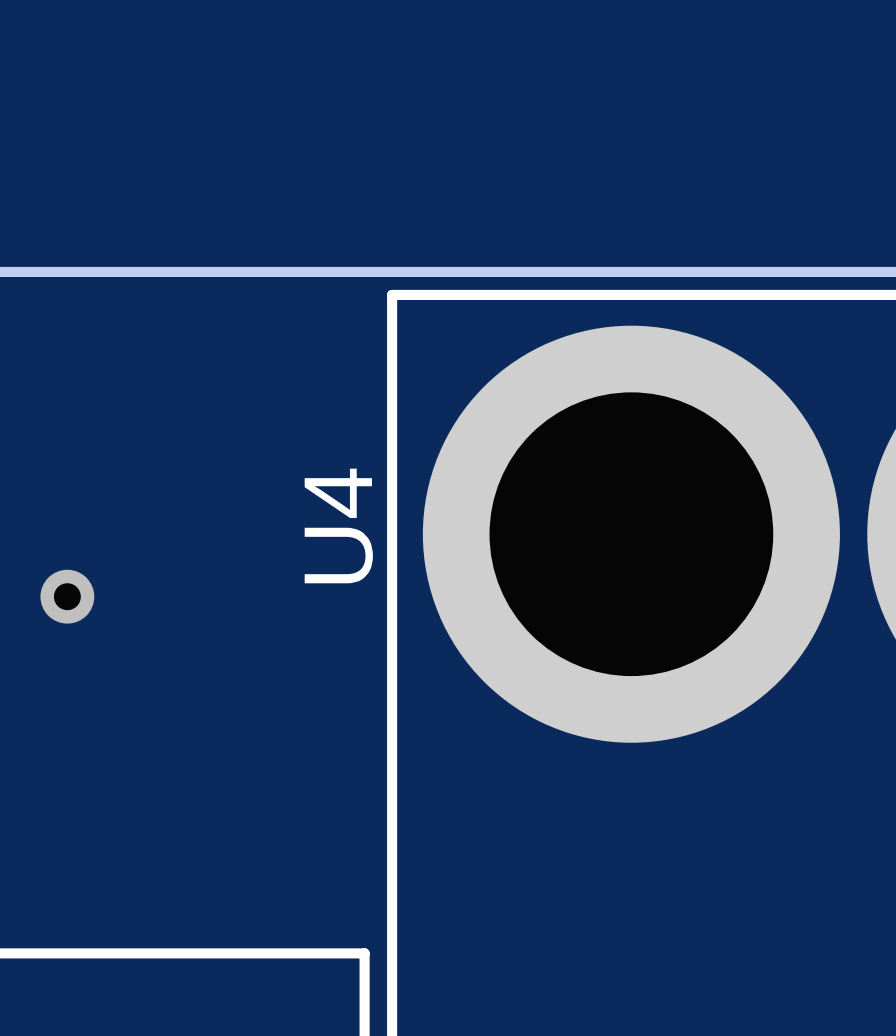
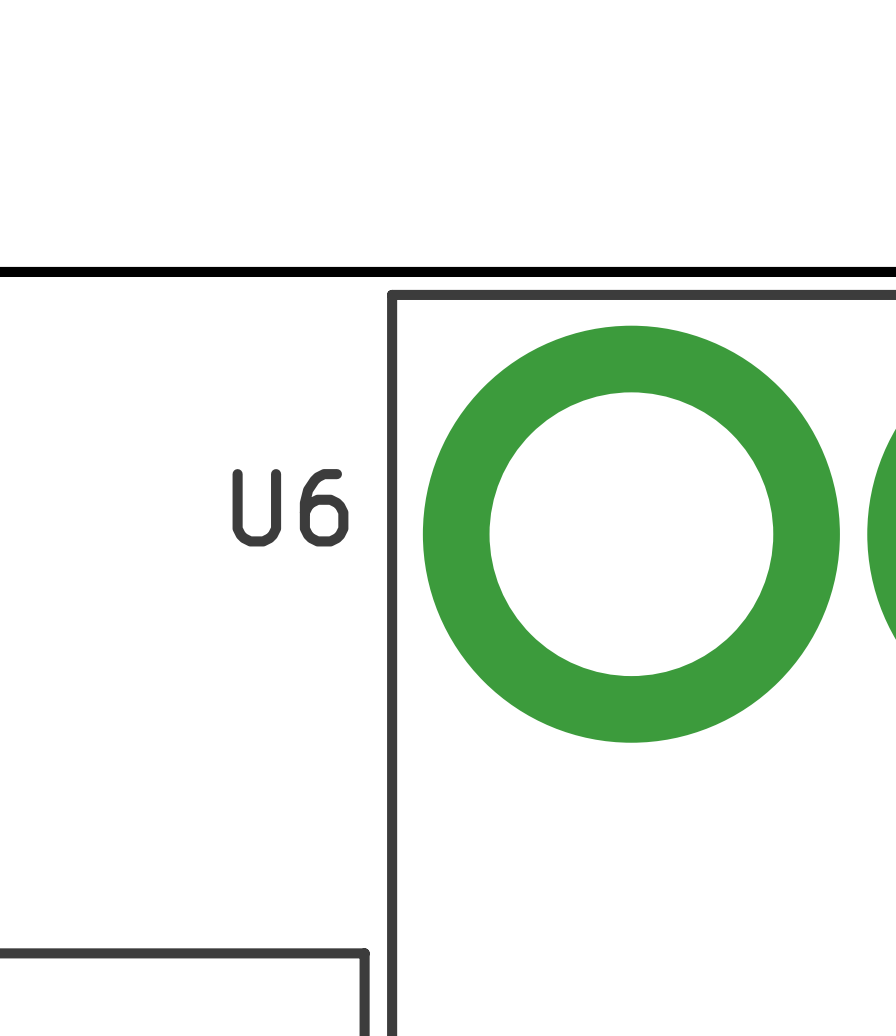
U4 name: U4 (338, 525) -> U6 (290, 507)
via: (67, 596) -> none

